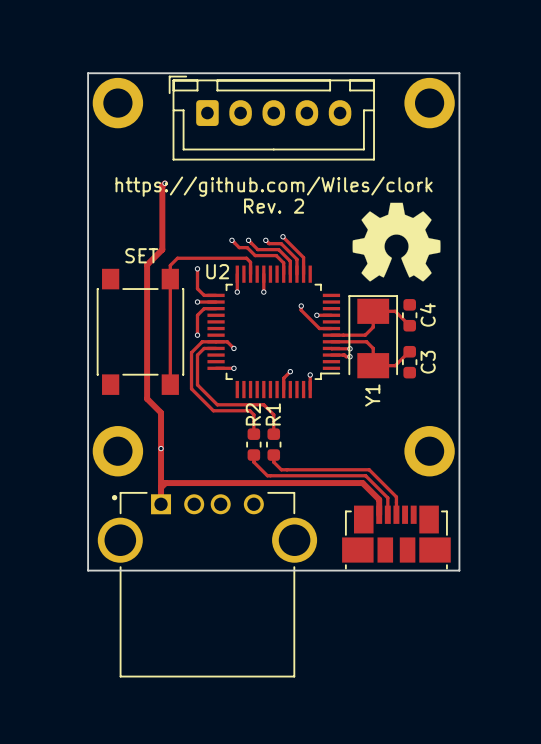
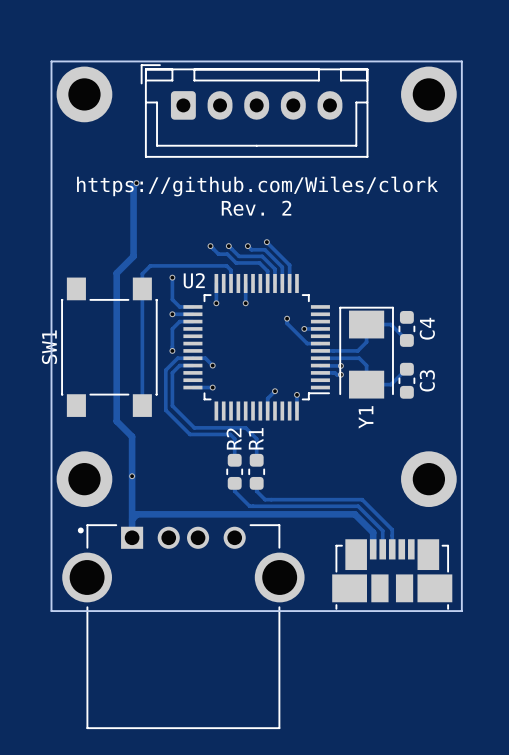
drawing: [352, 202, 441, 282] -> none
SET name: SET (141, 255) -> SW1 (49, 347)

